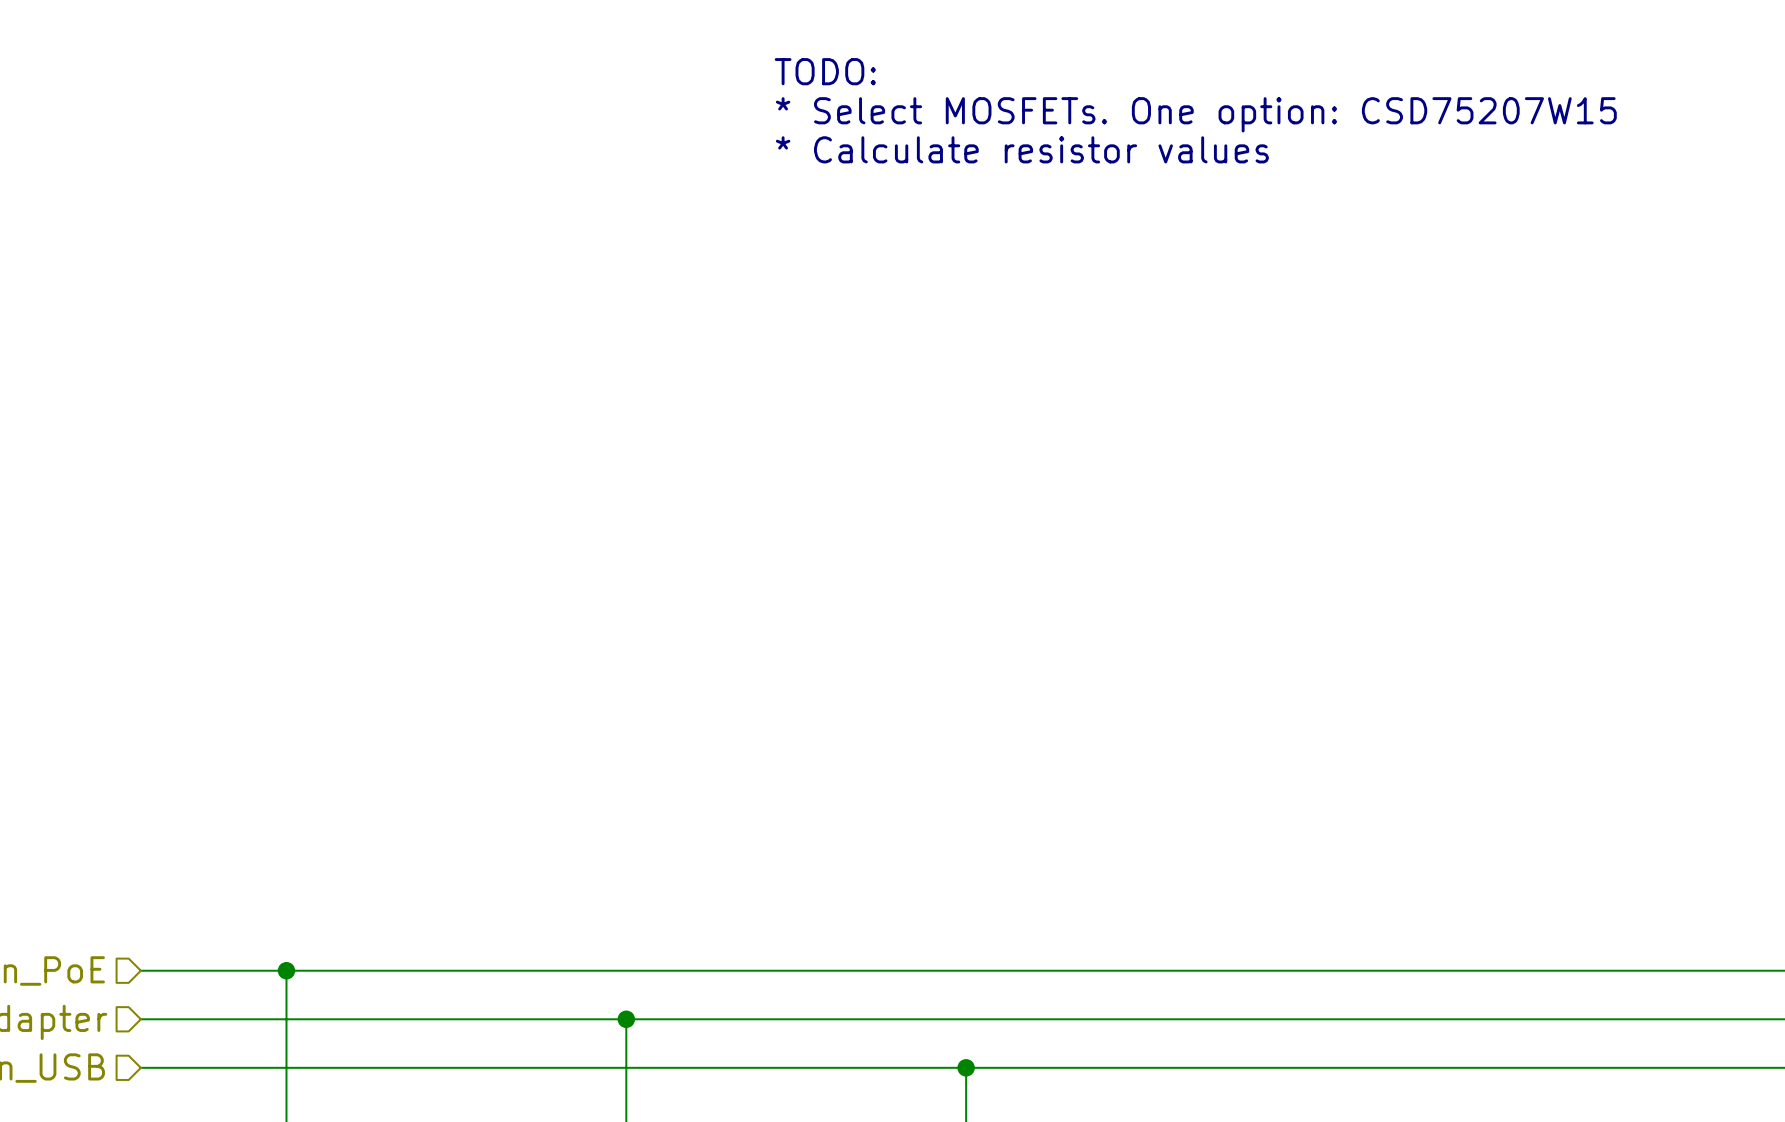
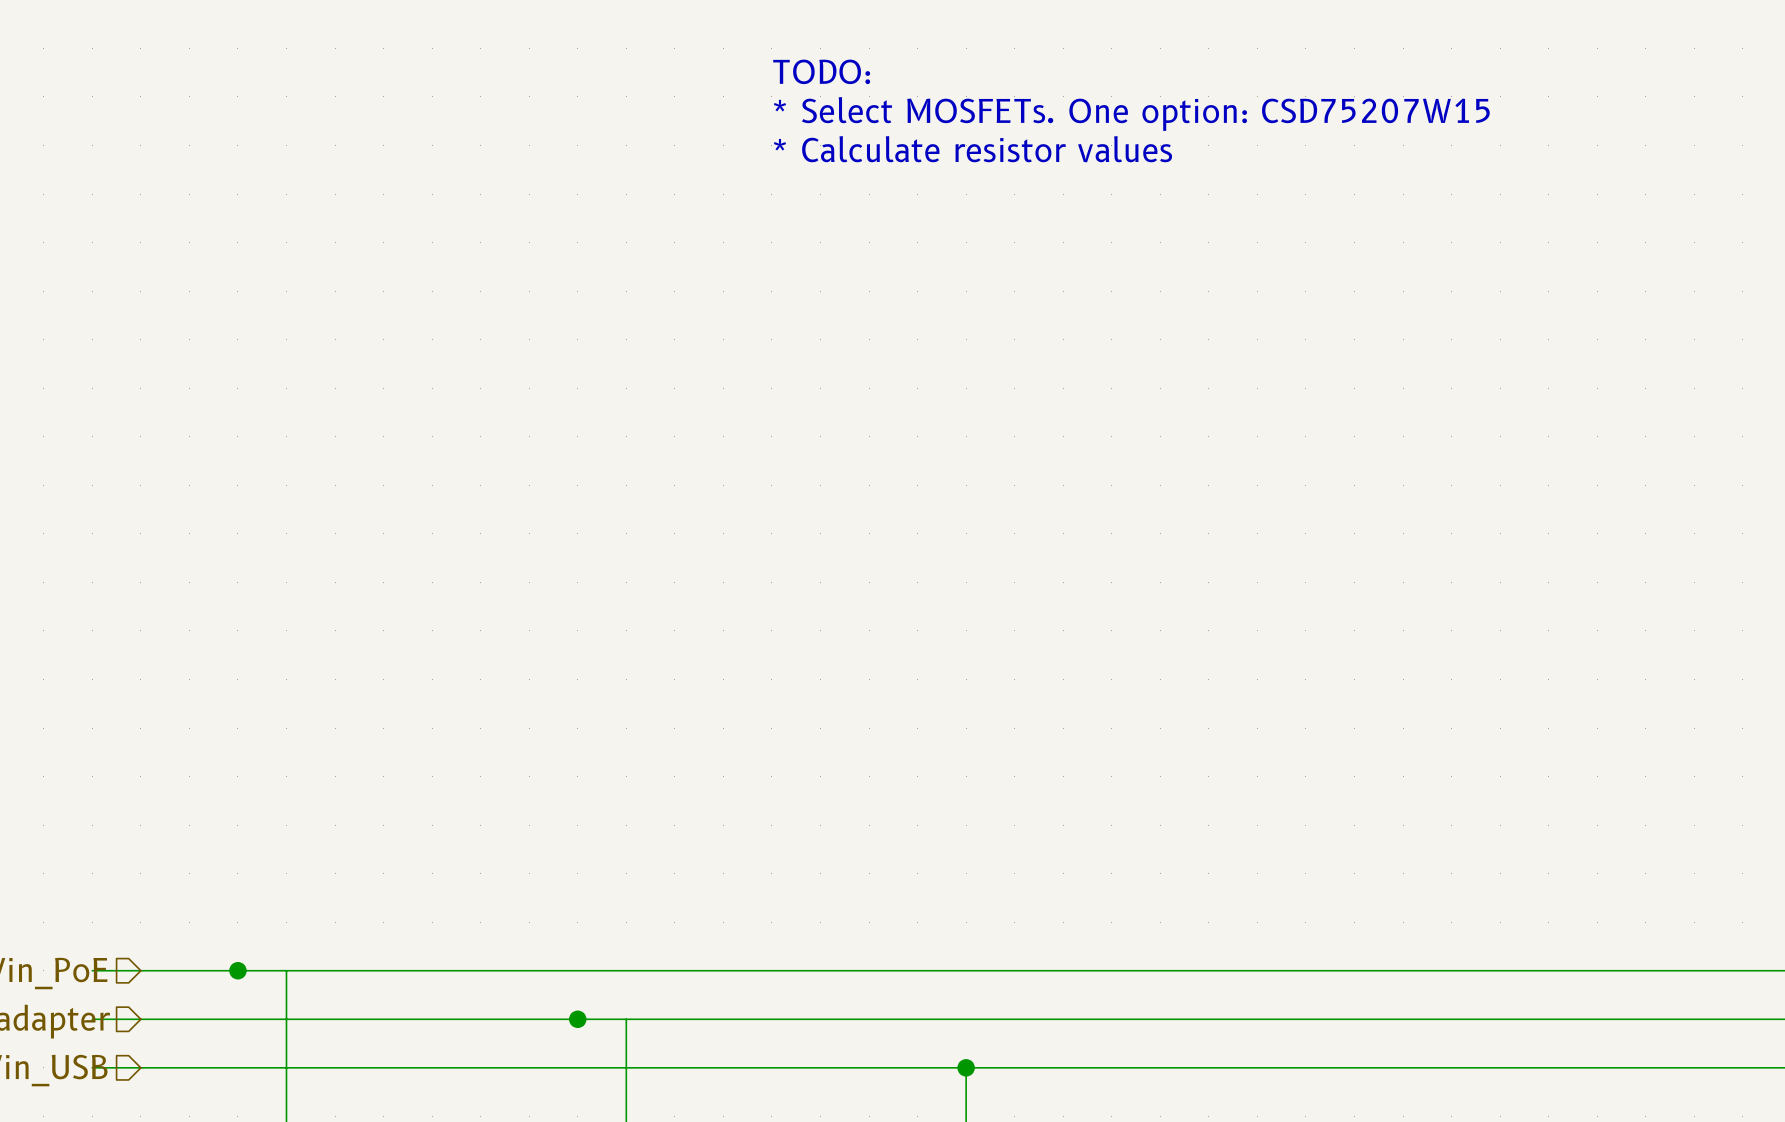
wire: none -> (92, 970) (140, 970)
junction position: (286, 970) -> (237, 970)
wire: none -> (92, 1019) (140, 1019)
junction position: (626, 1019) -> (577, 1019)
wire: none -> (92, 1067) (140, 1067)

